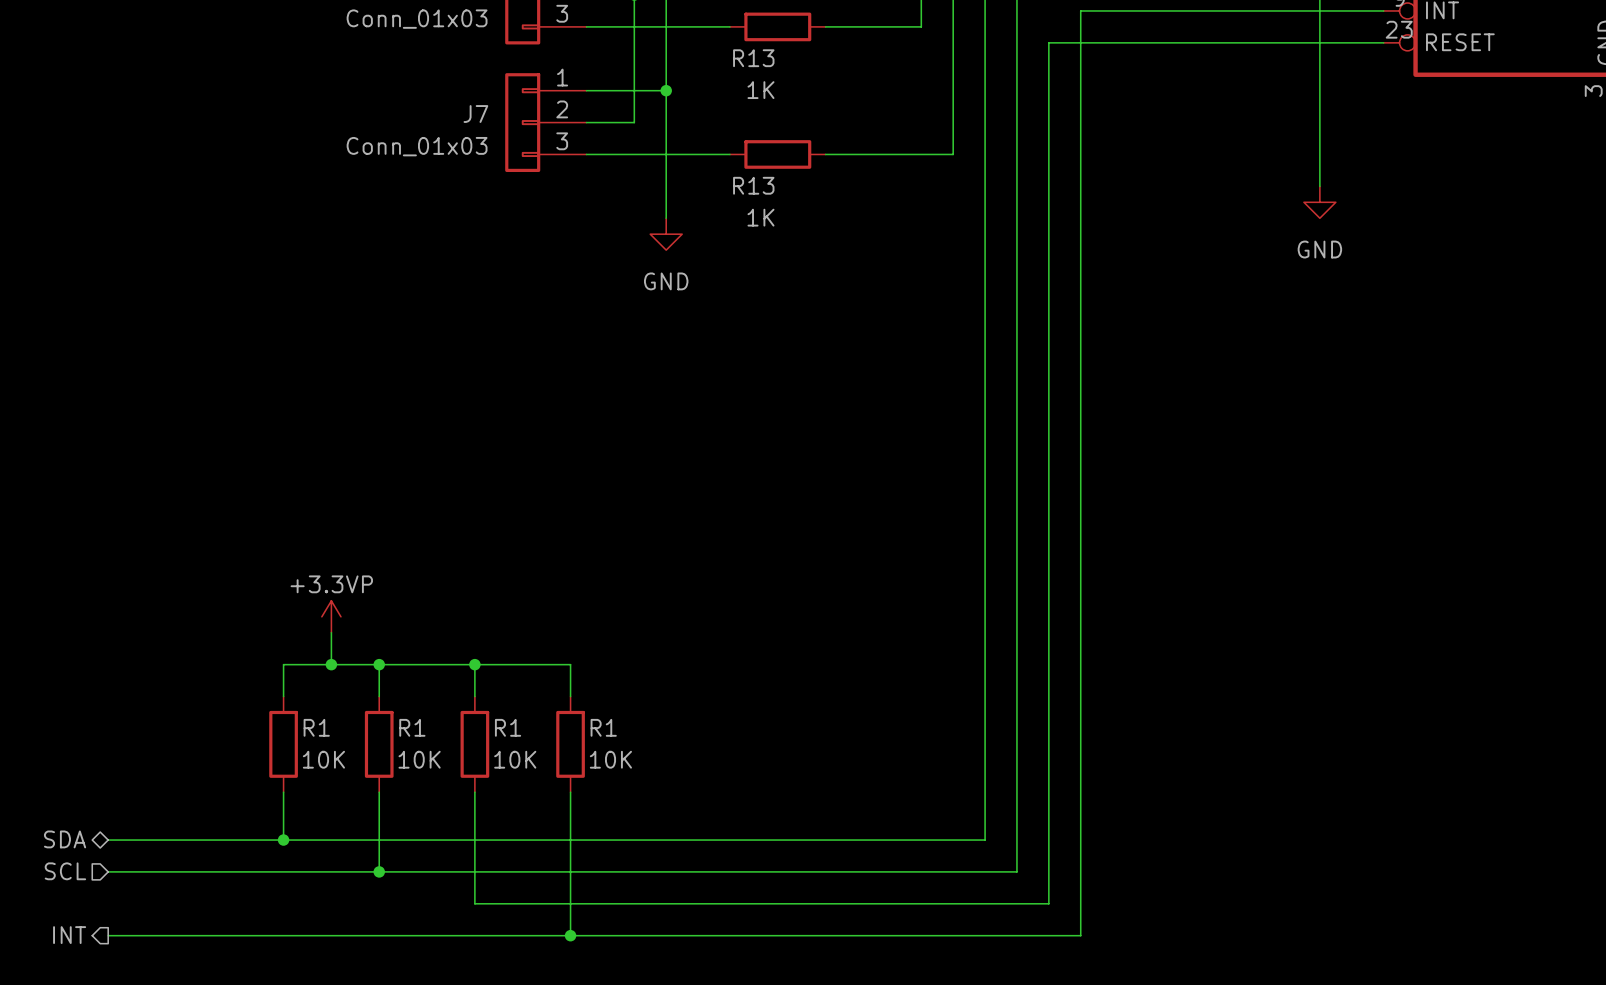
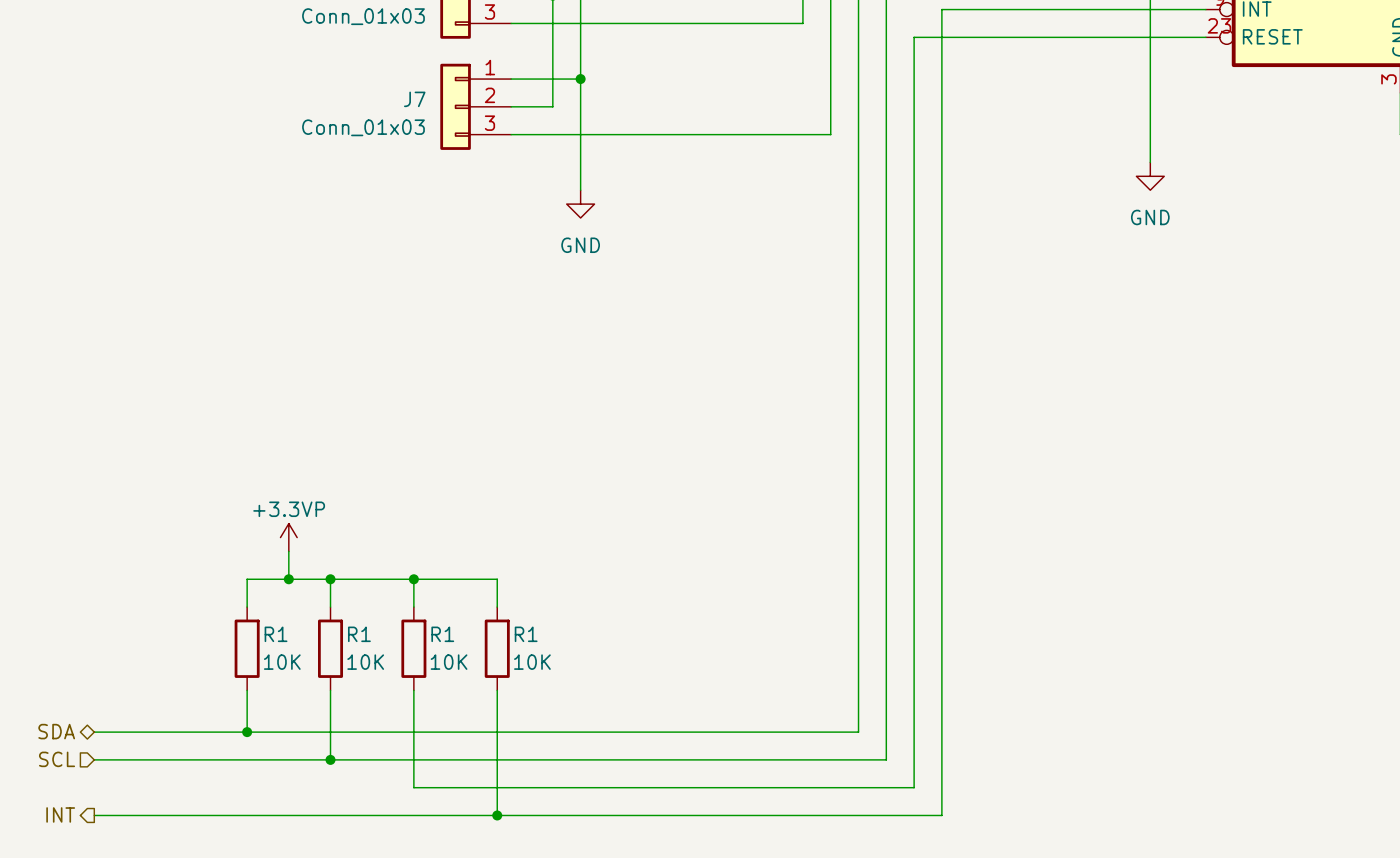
wire: none -> (636, 23) (719, 23)
R13: 1K (777, 26) -> none
wire: none -> (636, 134) (719, 134)
R13: 1K (777, 154) -> none

